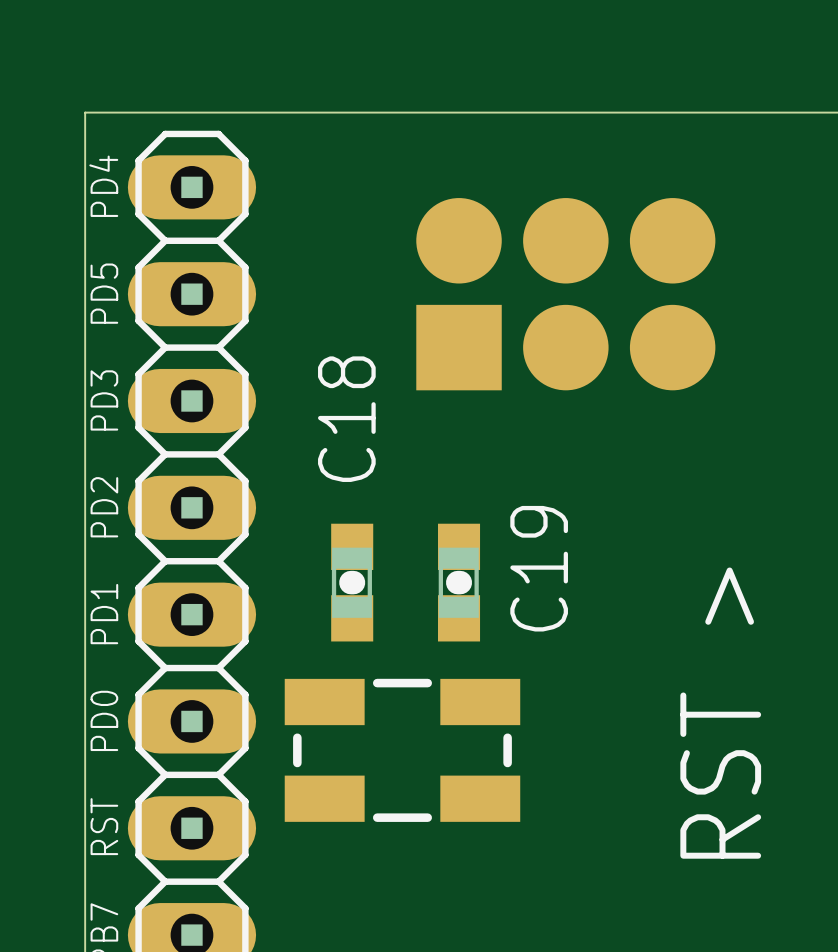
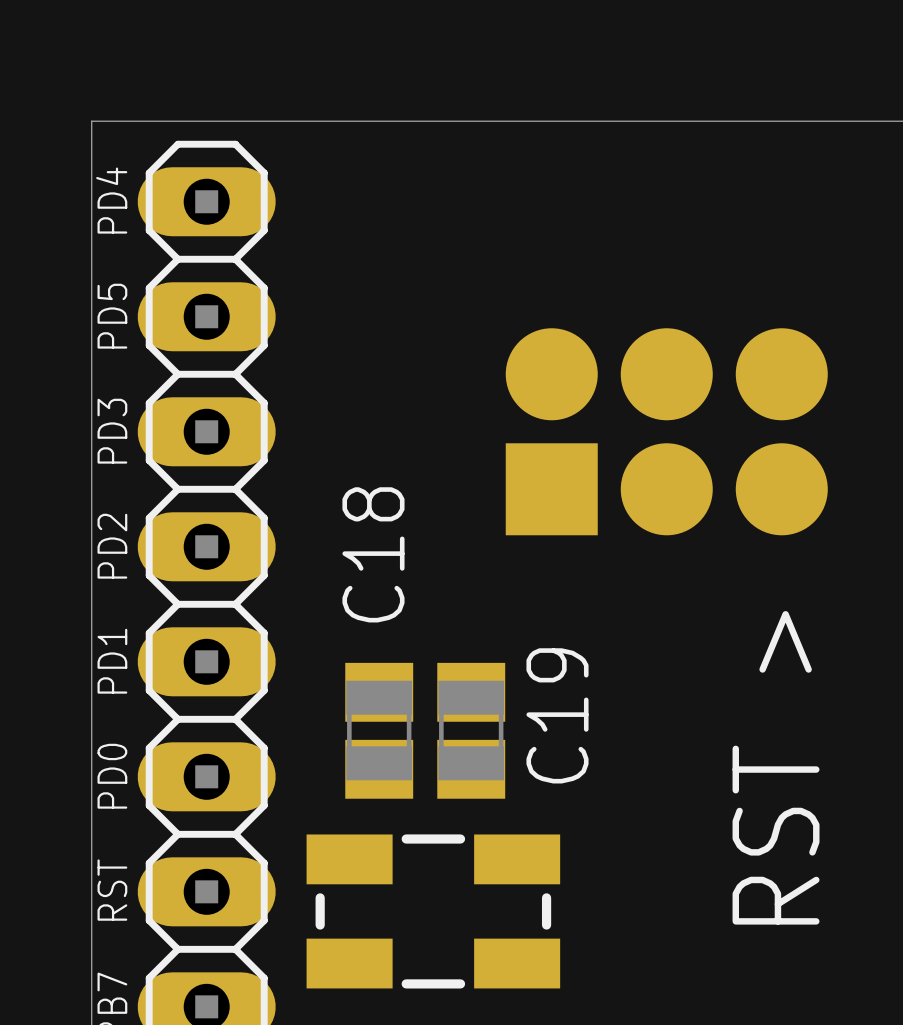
part position: (565, 294) -> (666, 431)
C18 footprint: [331, 523, 374, 642] -> [345, 662, 414, 799]
C19 footprint: [437, 523, 481, 642] -> [437, 662, 506, 799]
part position: (402, 750) -> (433, 911)

